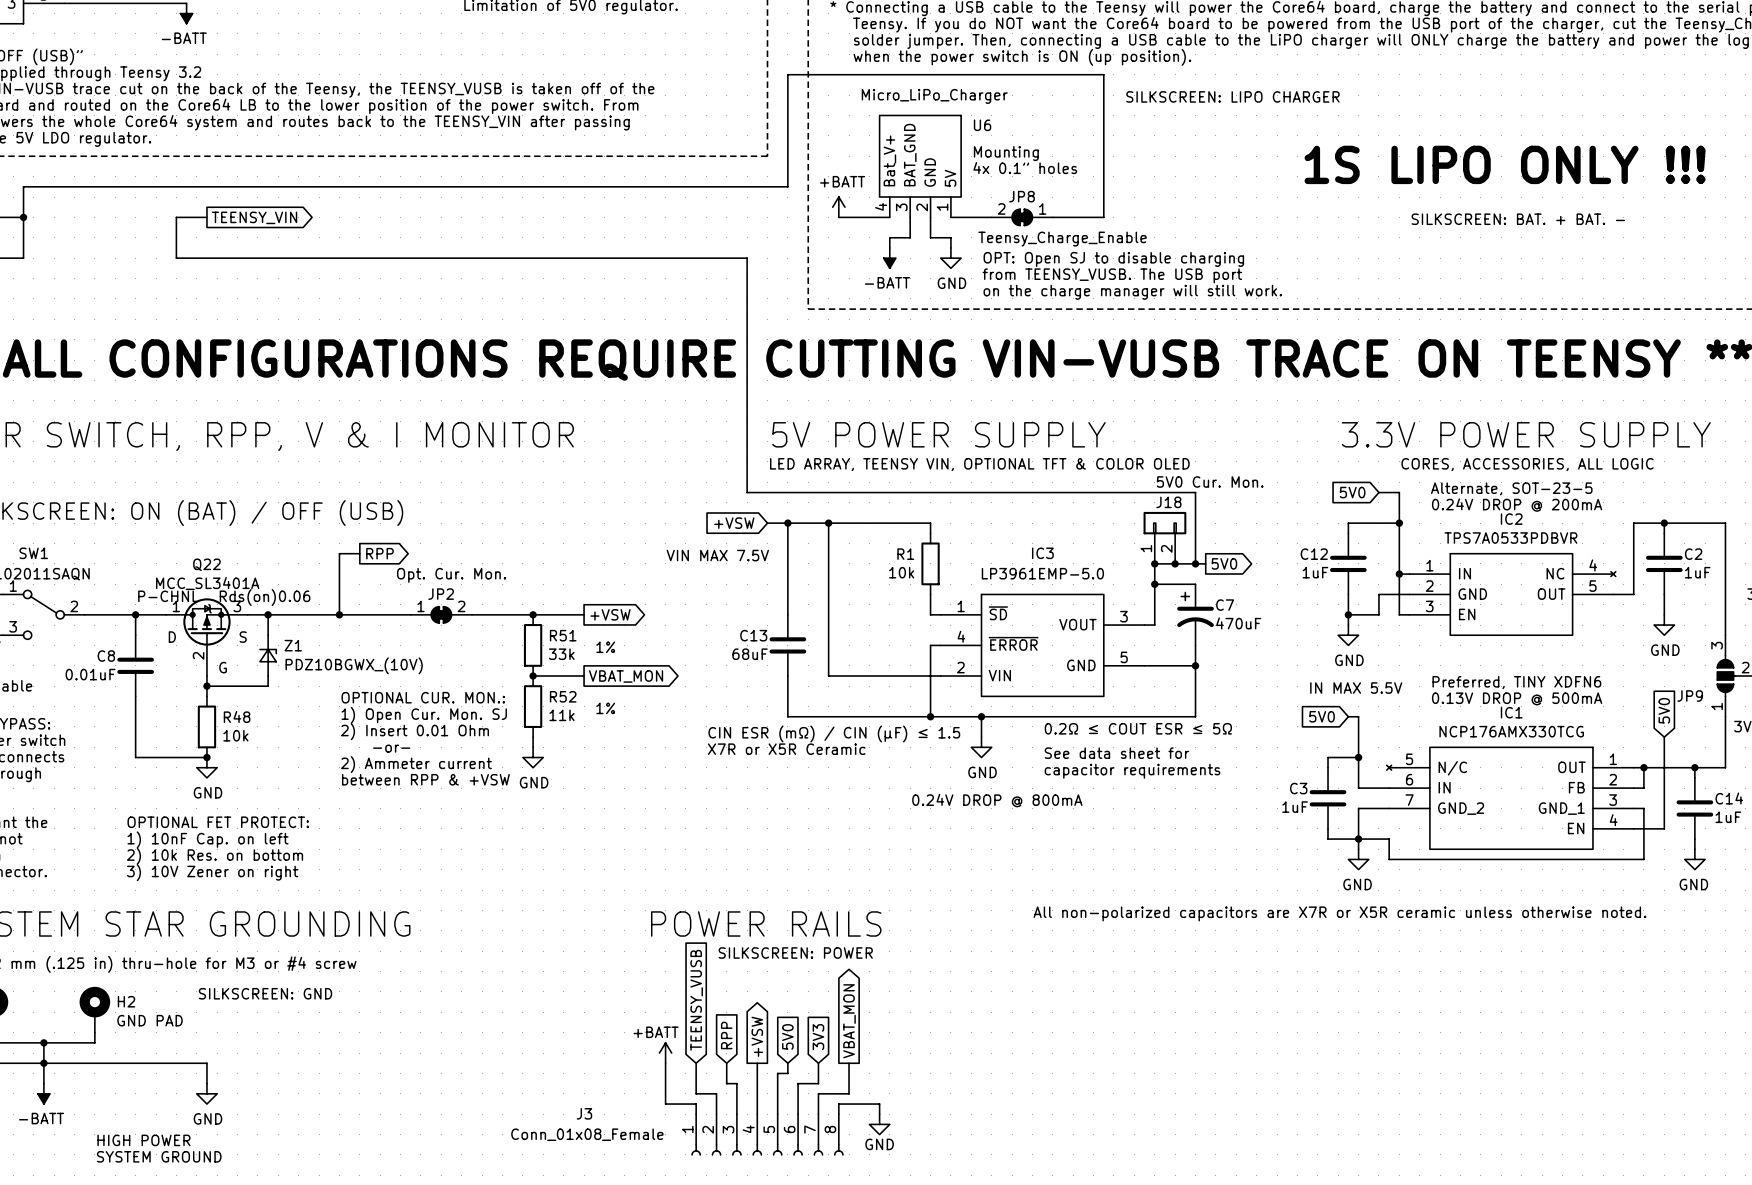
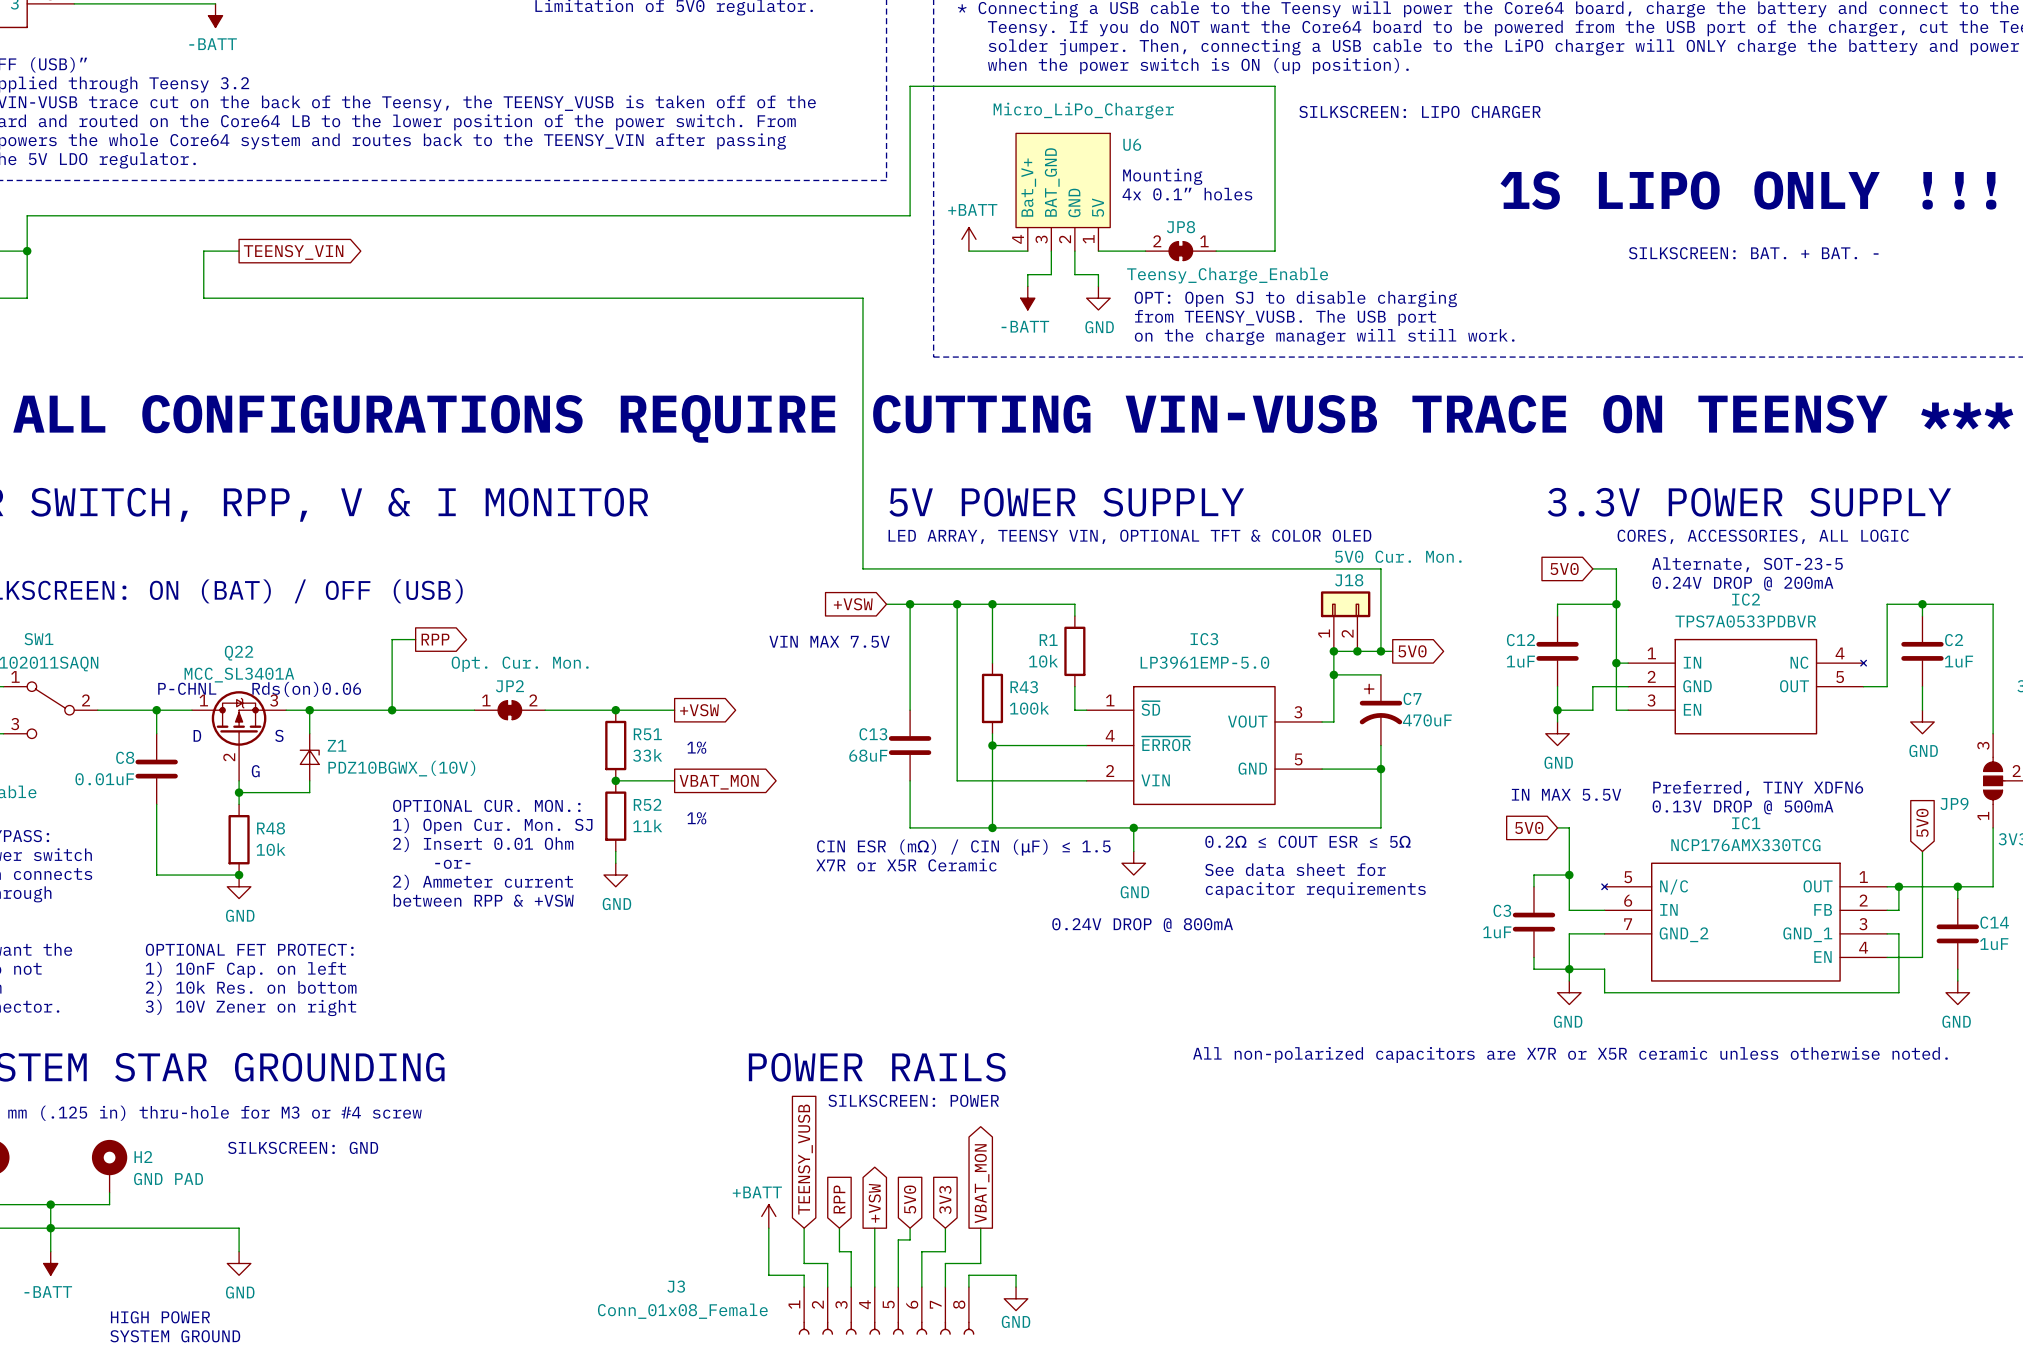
wire: none -> (992, 604) (992, 663)
junction: none -> (992, 604)
R43: none -> 100k (992, 698)
wire: none -> (992, 733) (992, 827)
junction: none -> (992, 745)
wire: (930, 645) (930, 716) -> (1074, 745) (992, 745)
junction: none -> (992, 827)
junction: (930, 716) -> none

